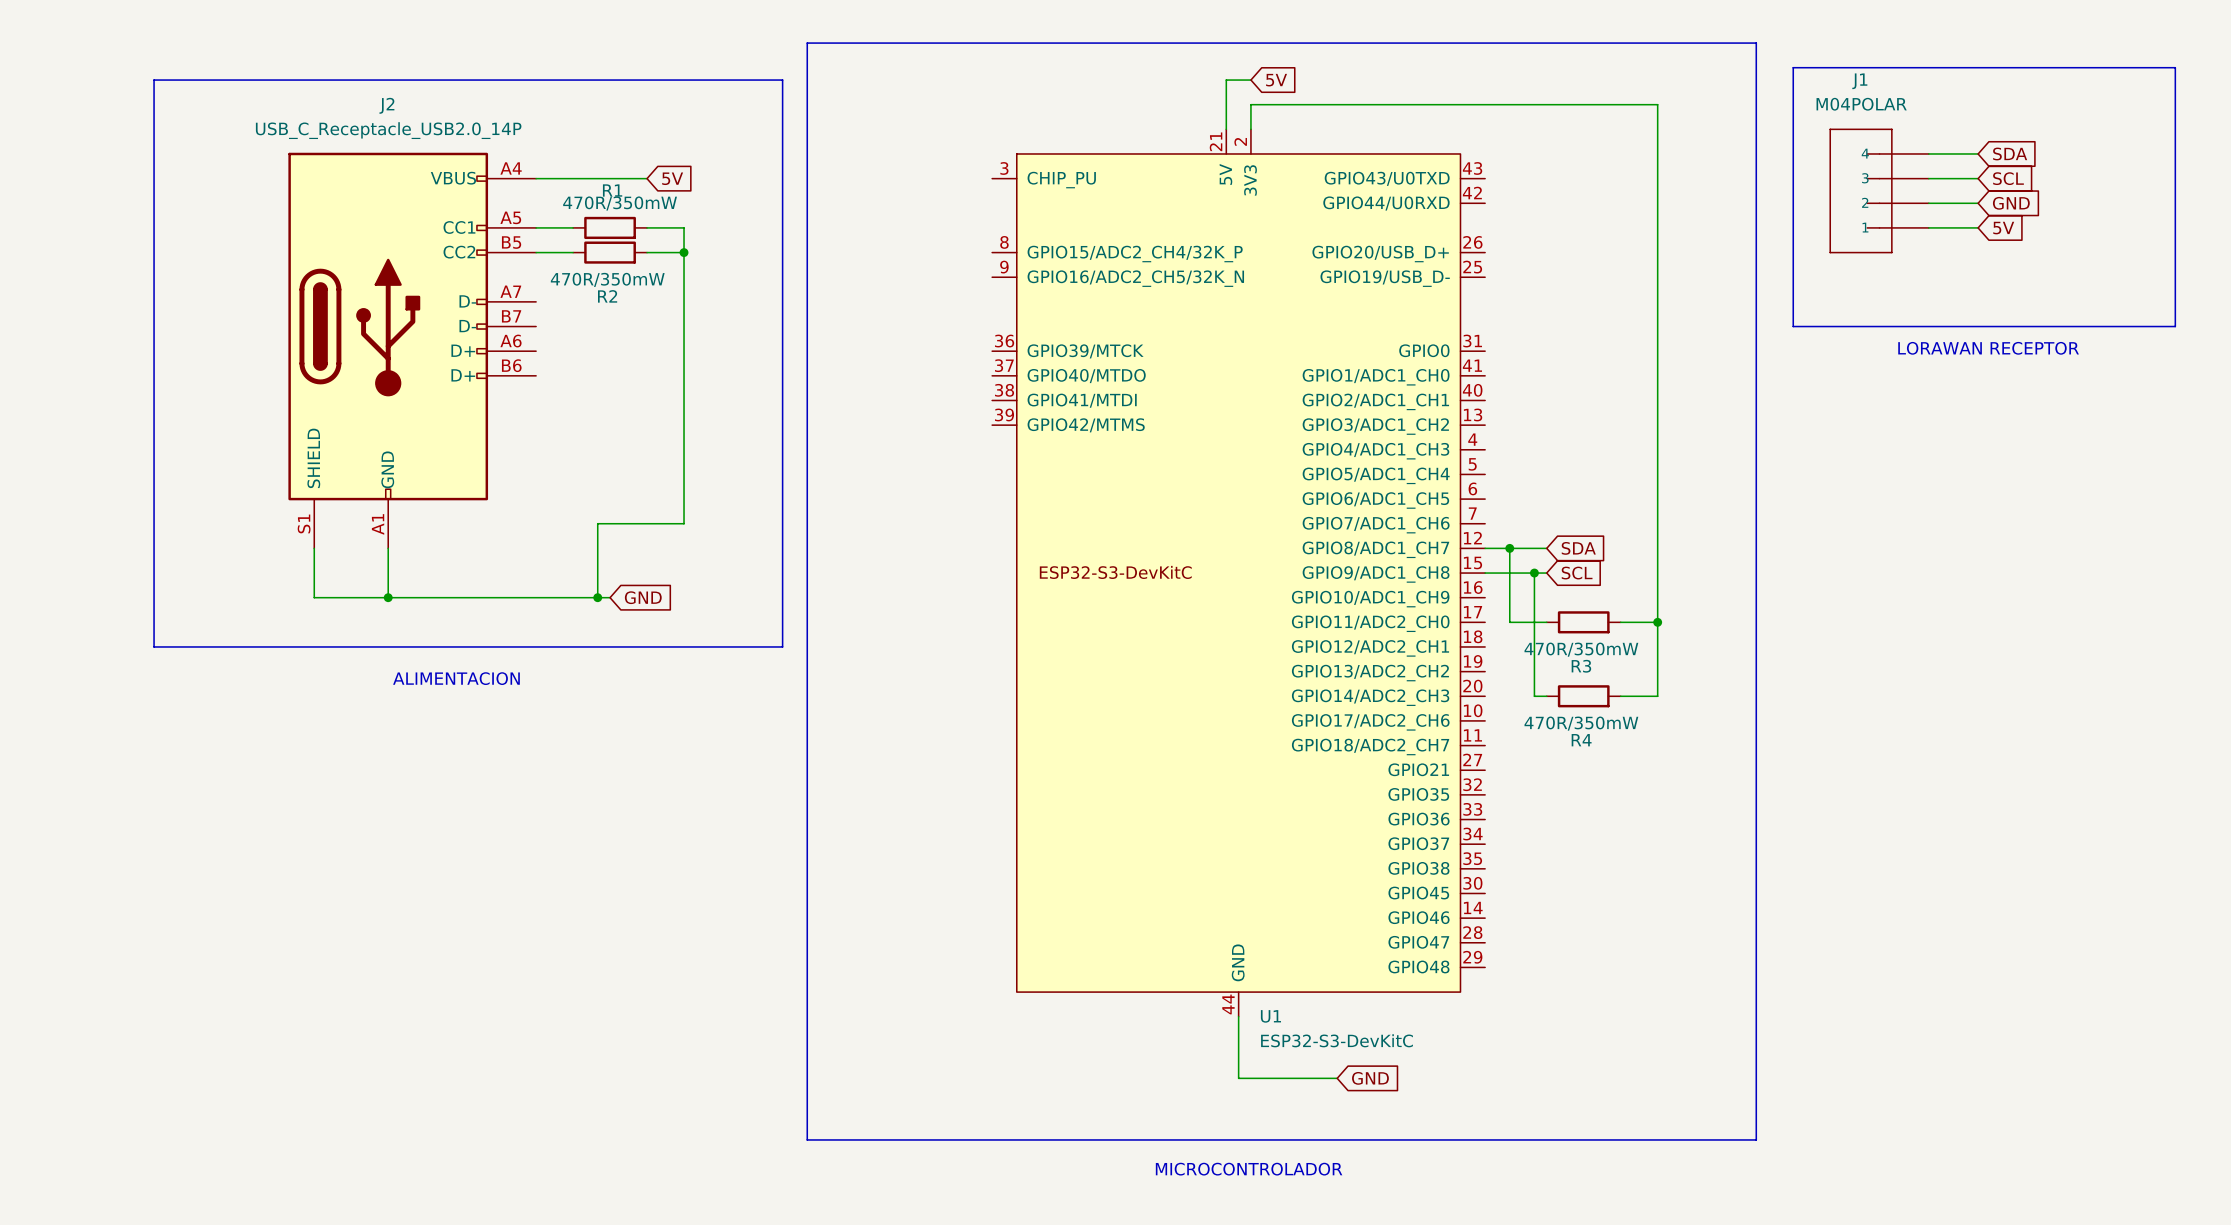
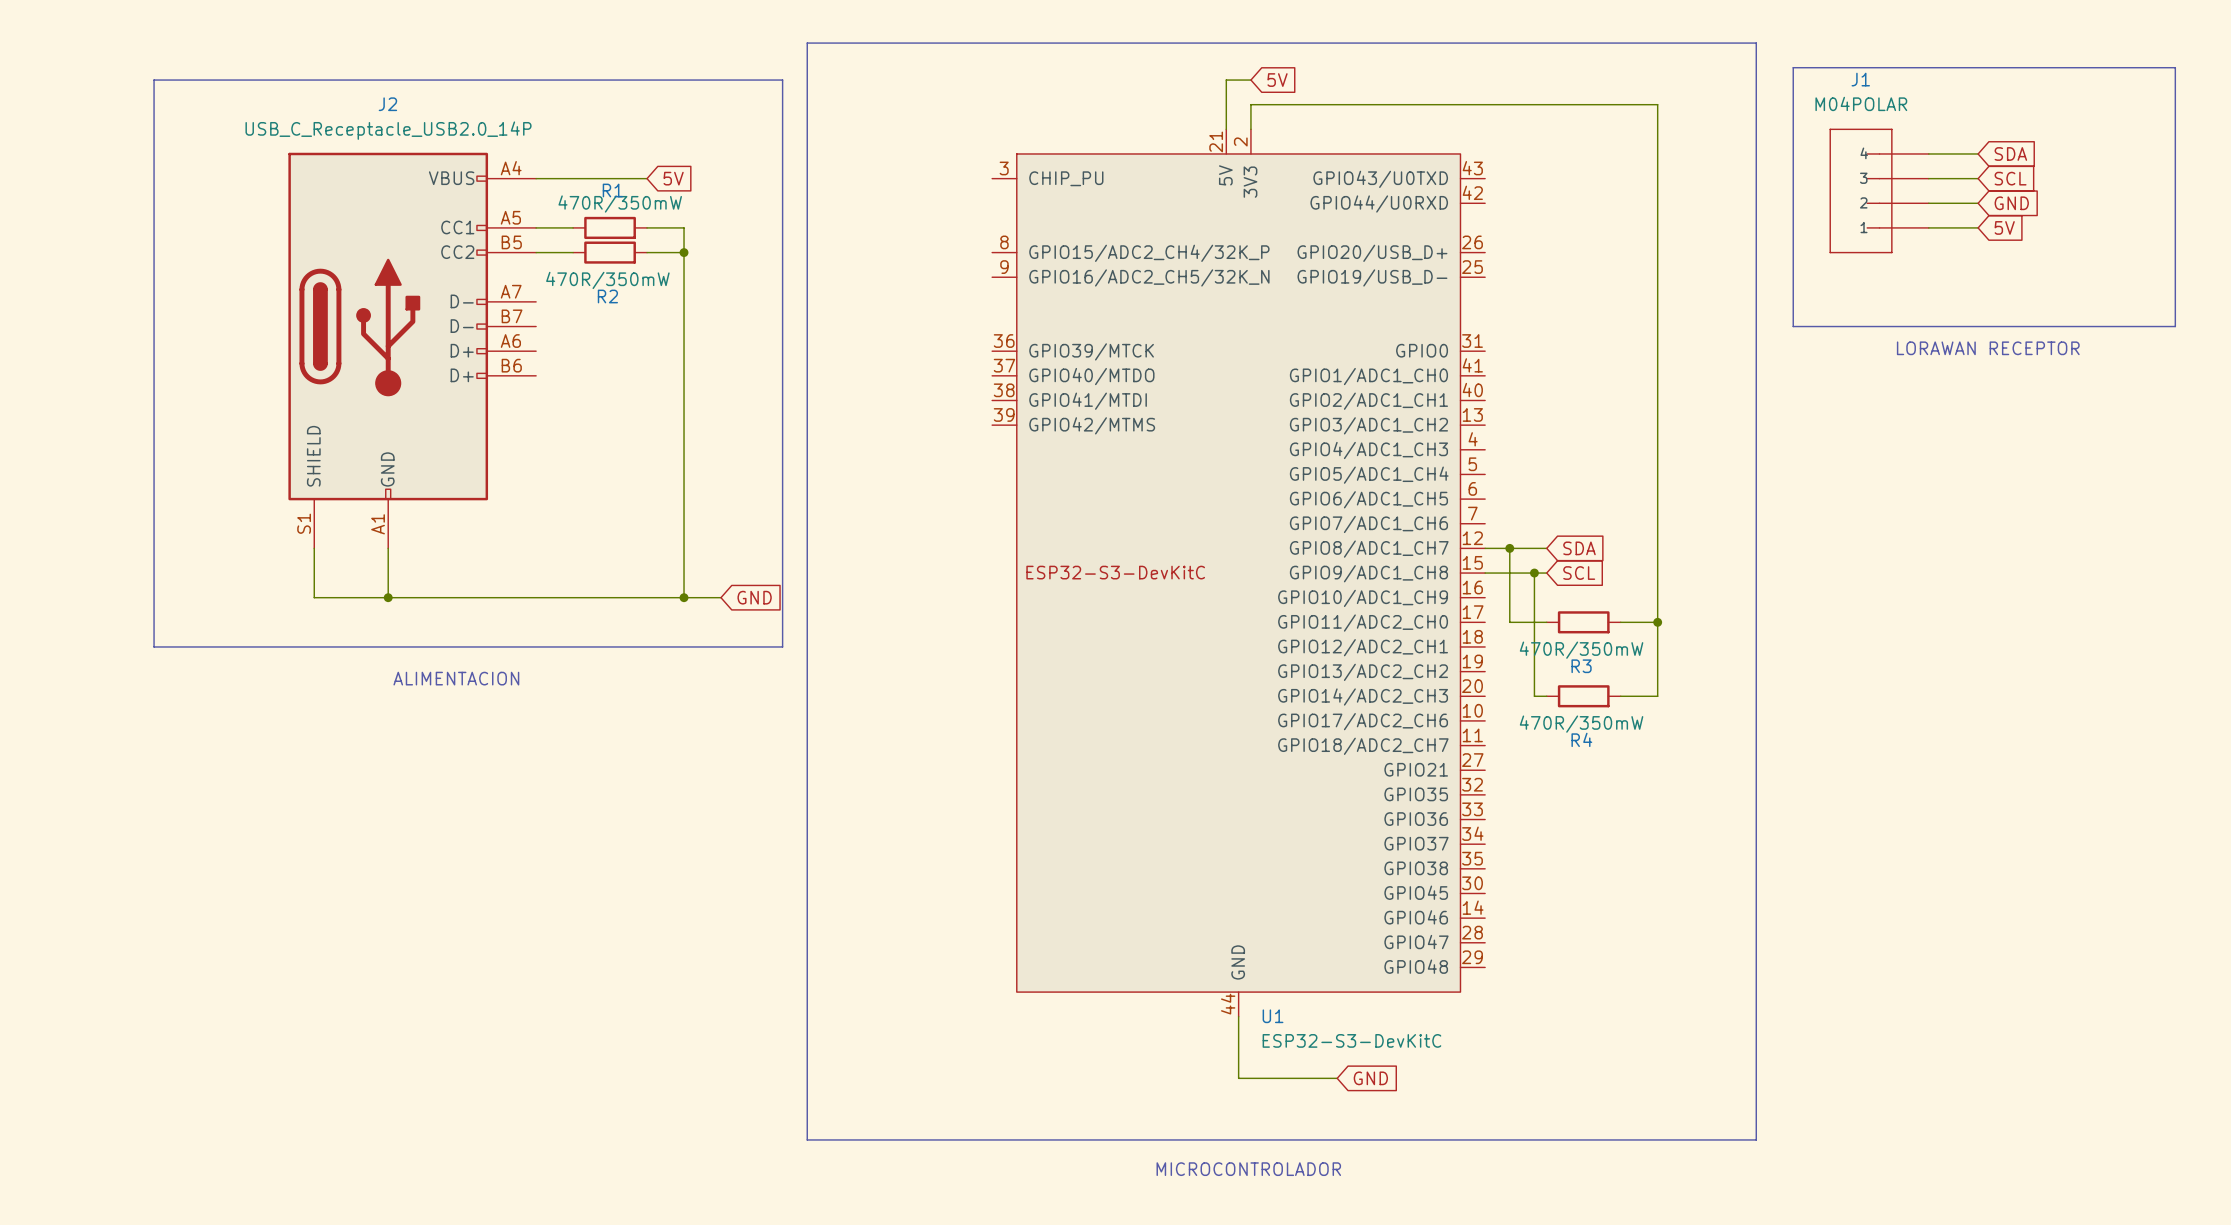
wire: (684, 523) (597, 523) (597, 597) -> (684, 523) (684, 597)
junction: (597, 597) -> none
wire: none -> (610, 597) (720, 597)
global label position: GND (643, 597) -> GND (754, 597)
junction: none -> (684, 597)

